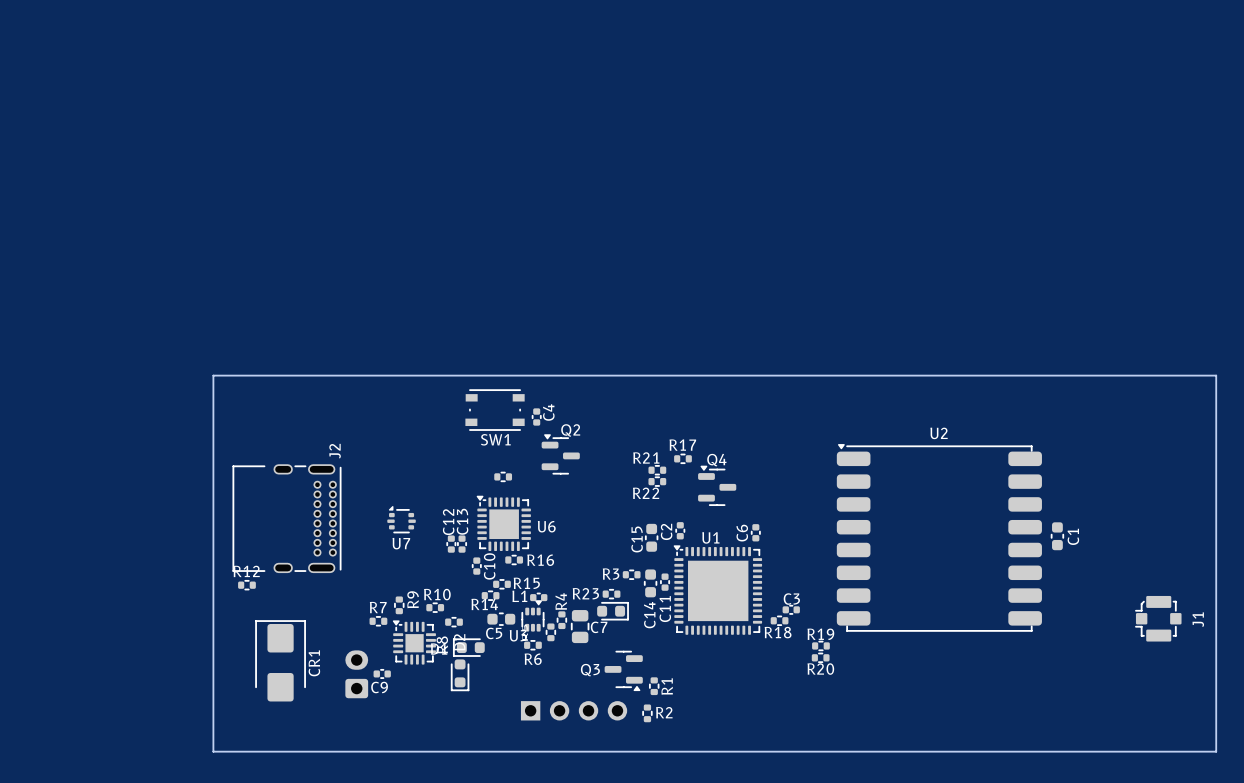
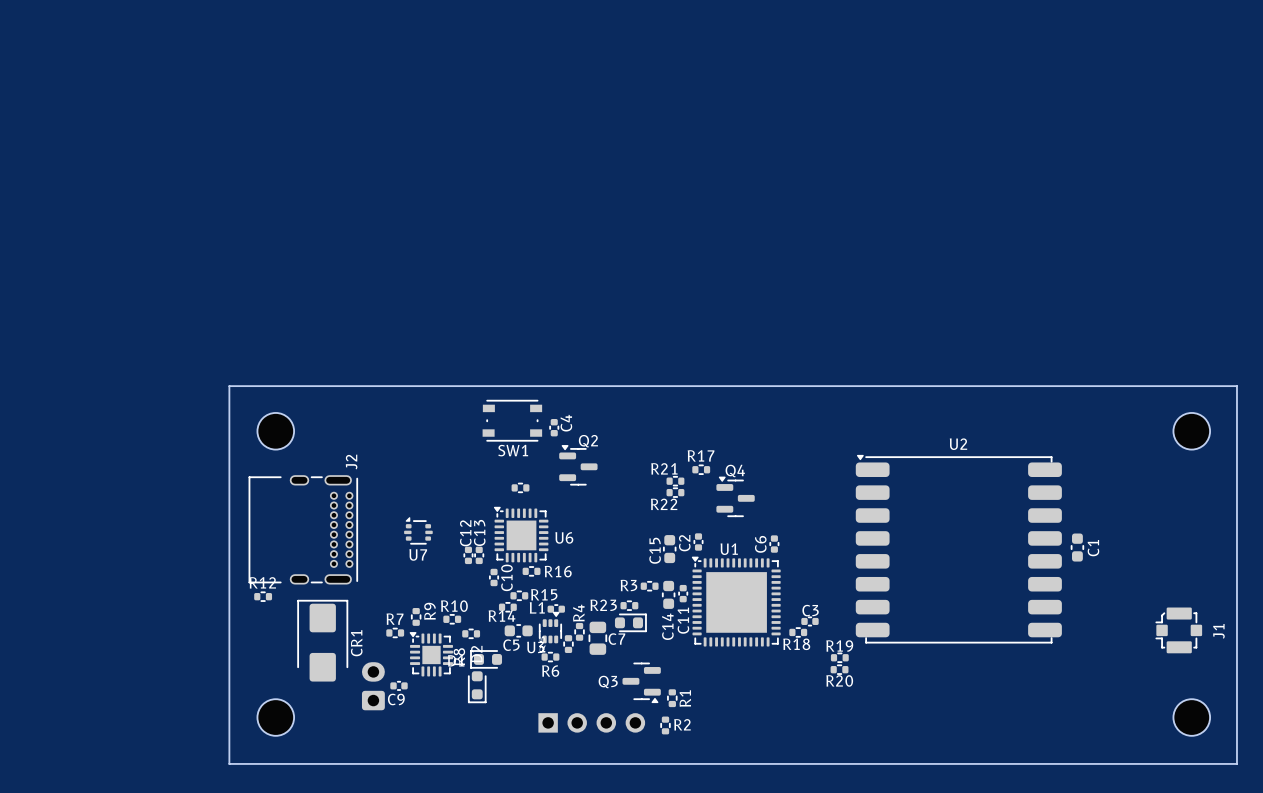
part: none -> (275, 431)
part: none -> (1191, 431)
CR1 position: (280, 660) -> (322, 640)
part: none -> (275, 717)
part: none -> (1191, 717)

